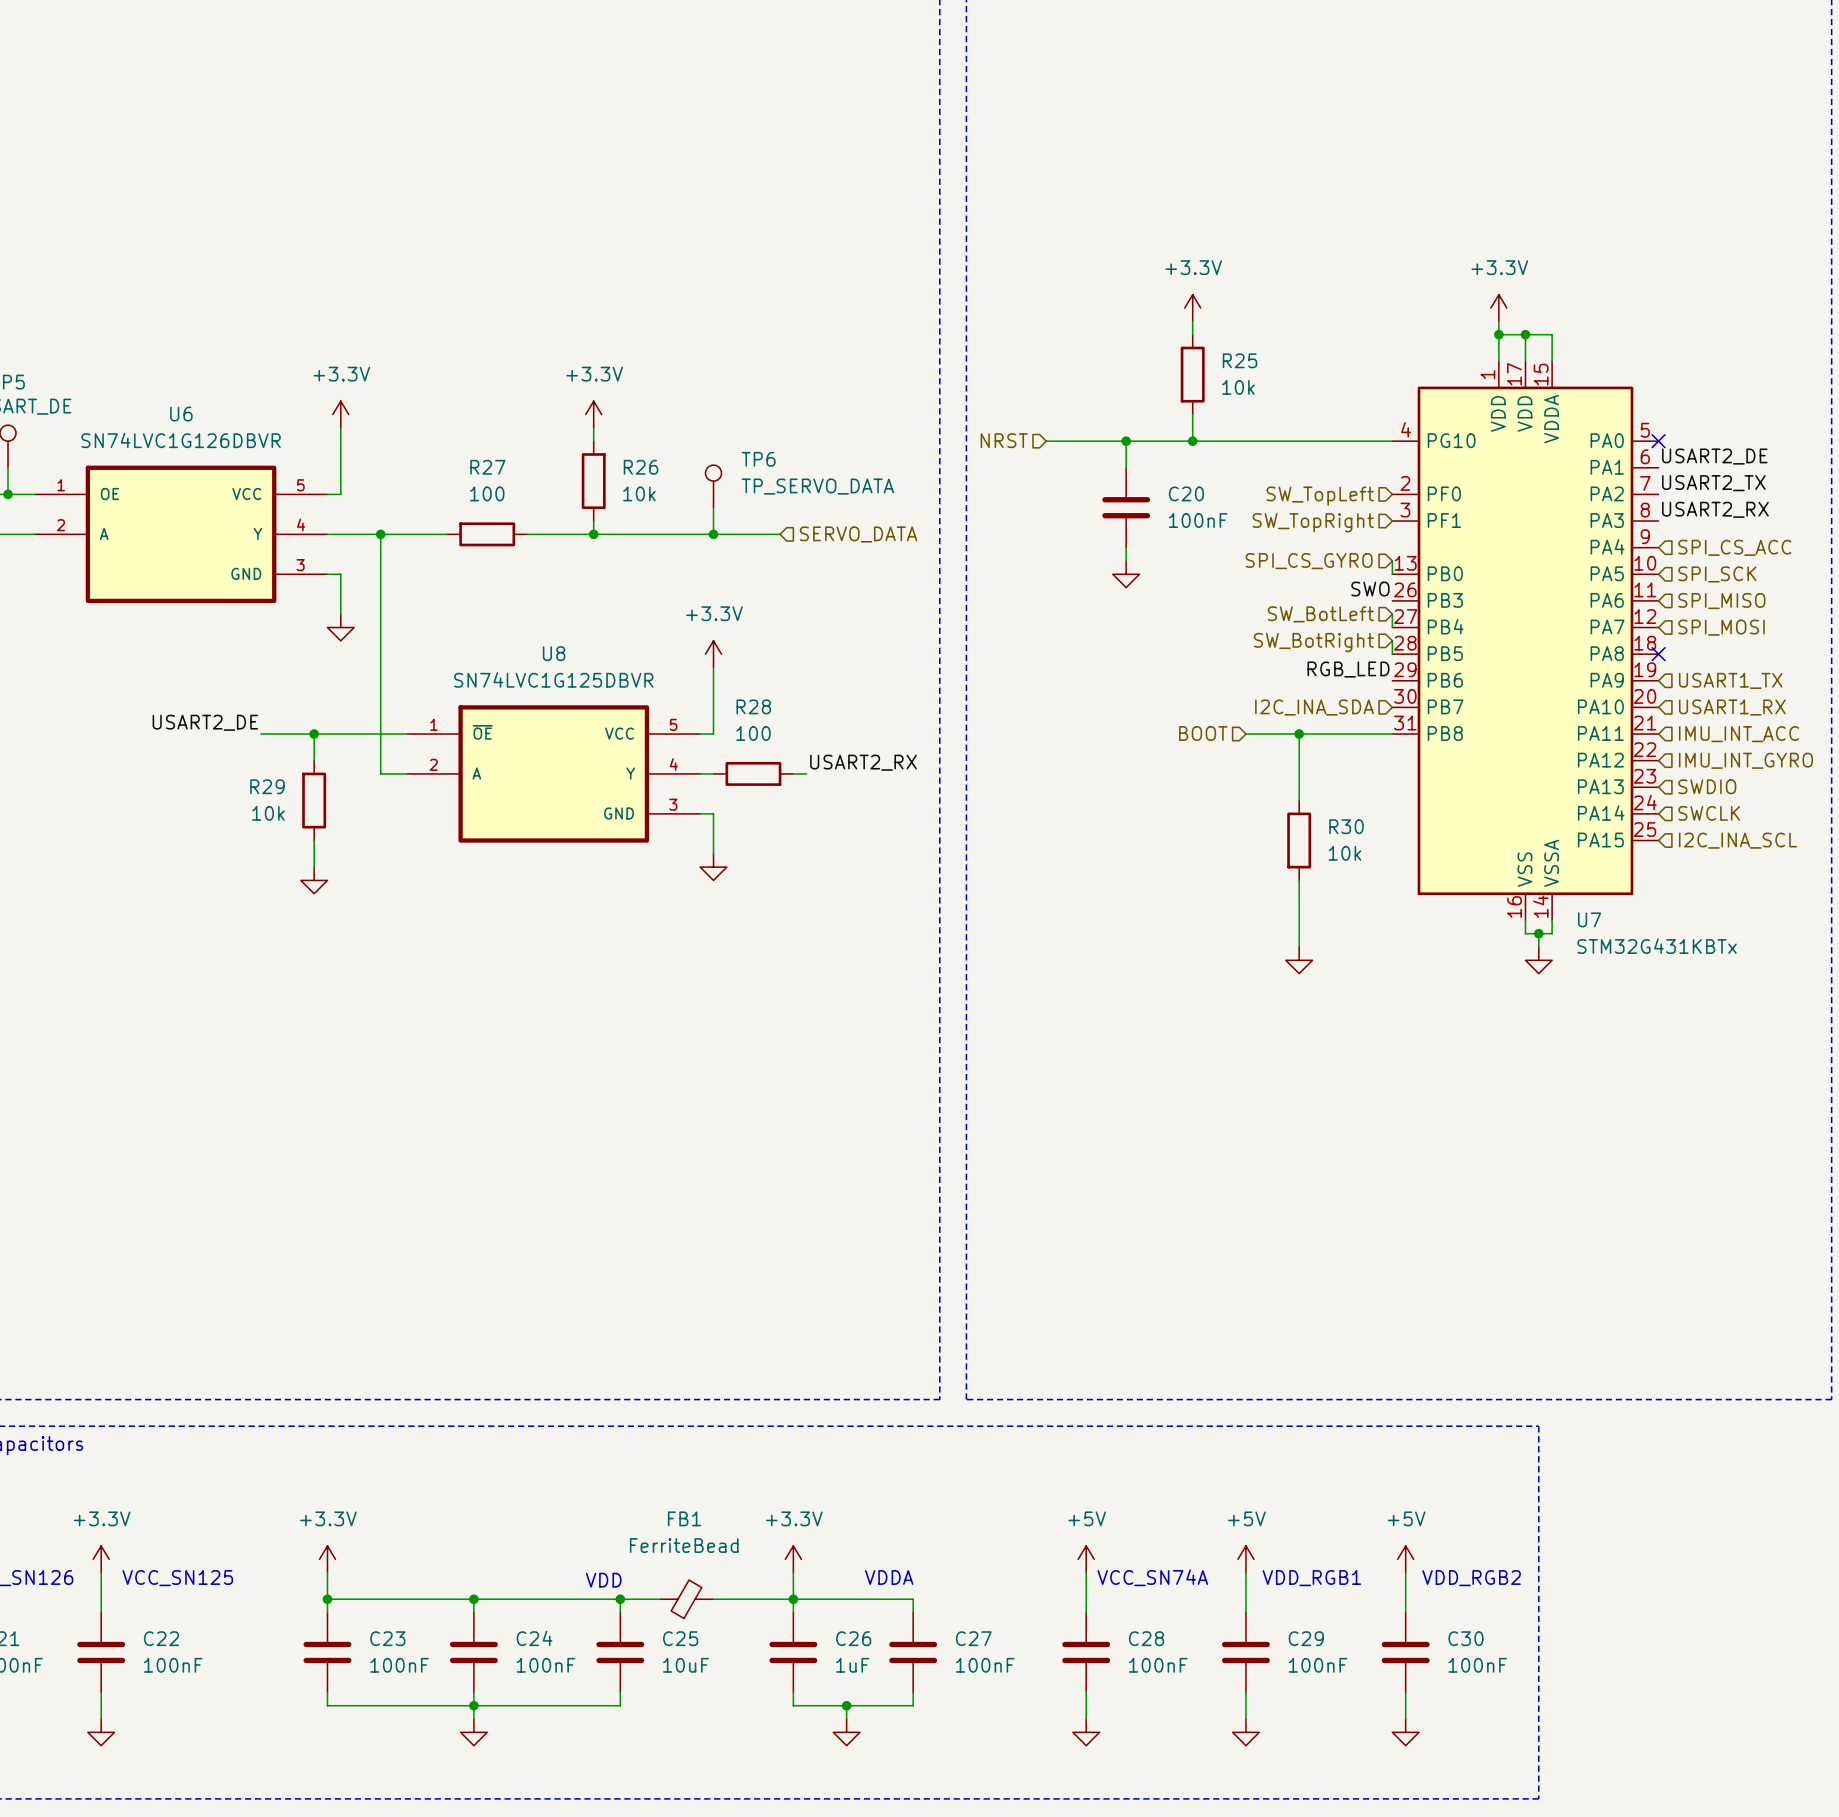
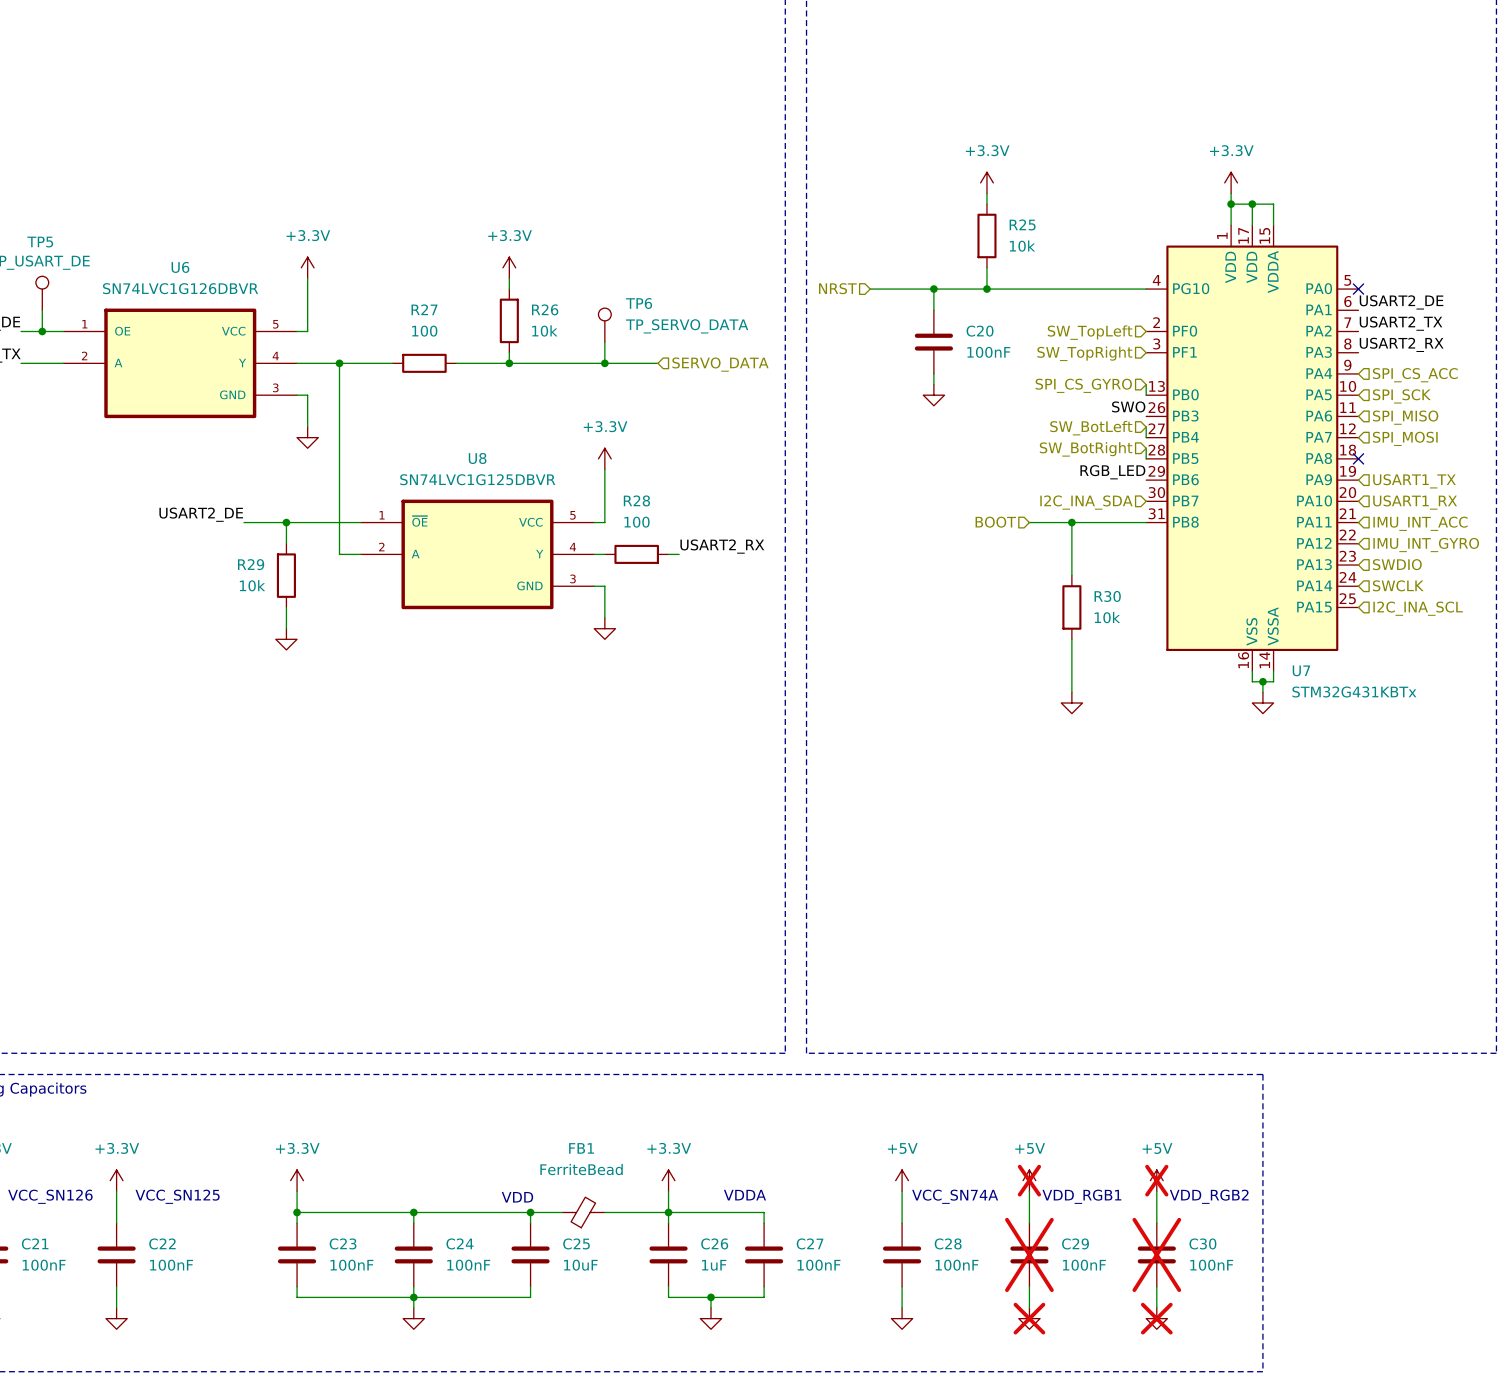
power symbol do-not-place cross: none -> (1029, 1180)
power symbol do-not-place cross: none -> (1156, 1180)
C29 do-not-place cross: none -> (1029, 1254)
C30 do-not-place cross: none -> (1156, 1254)
power symbol do-not-place cross: none -> (1029, 1318)
power symbol do-not-place cross: none -> (1156, 1318)

